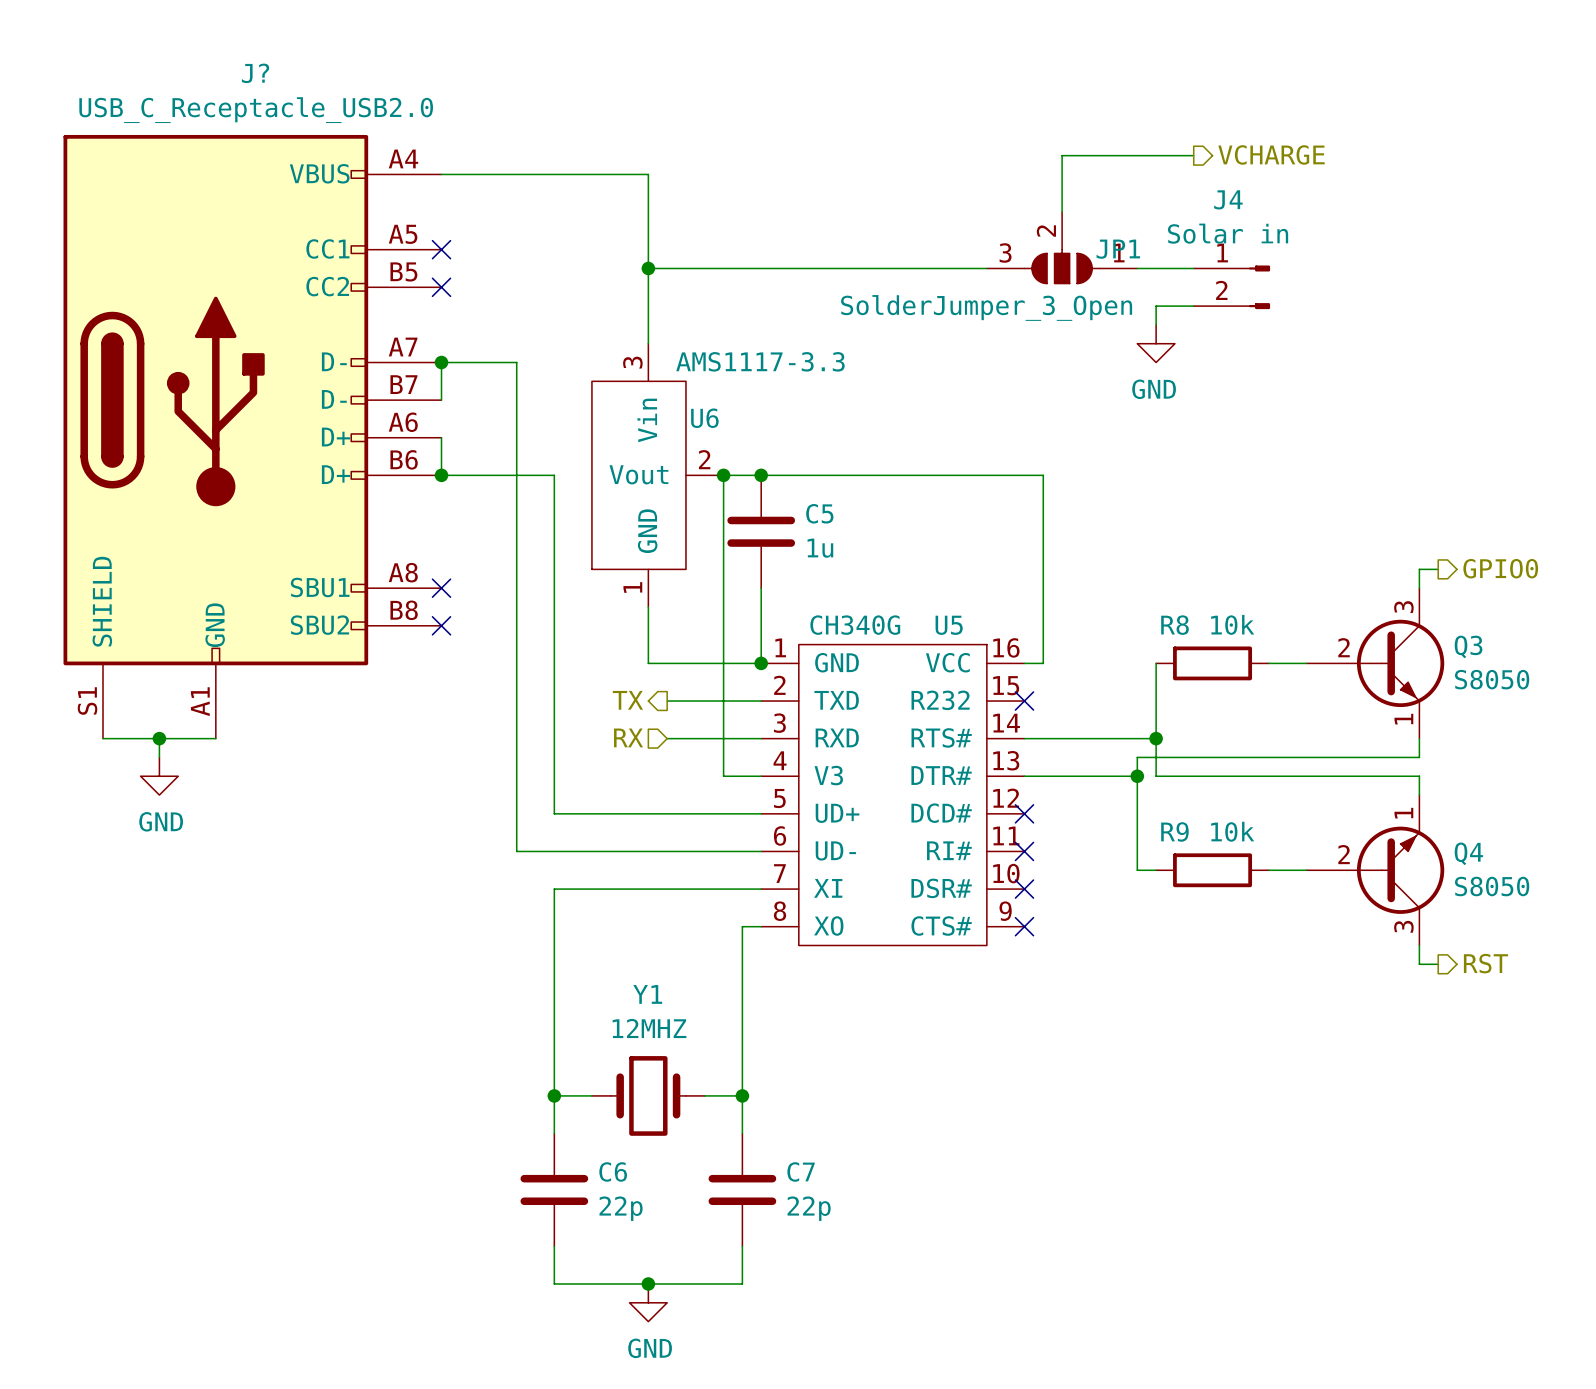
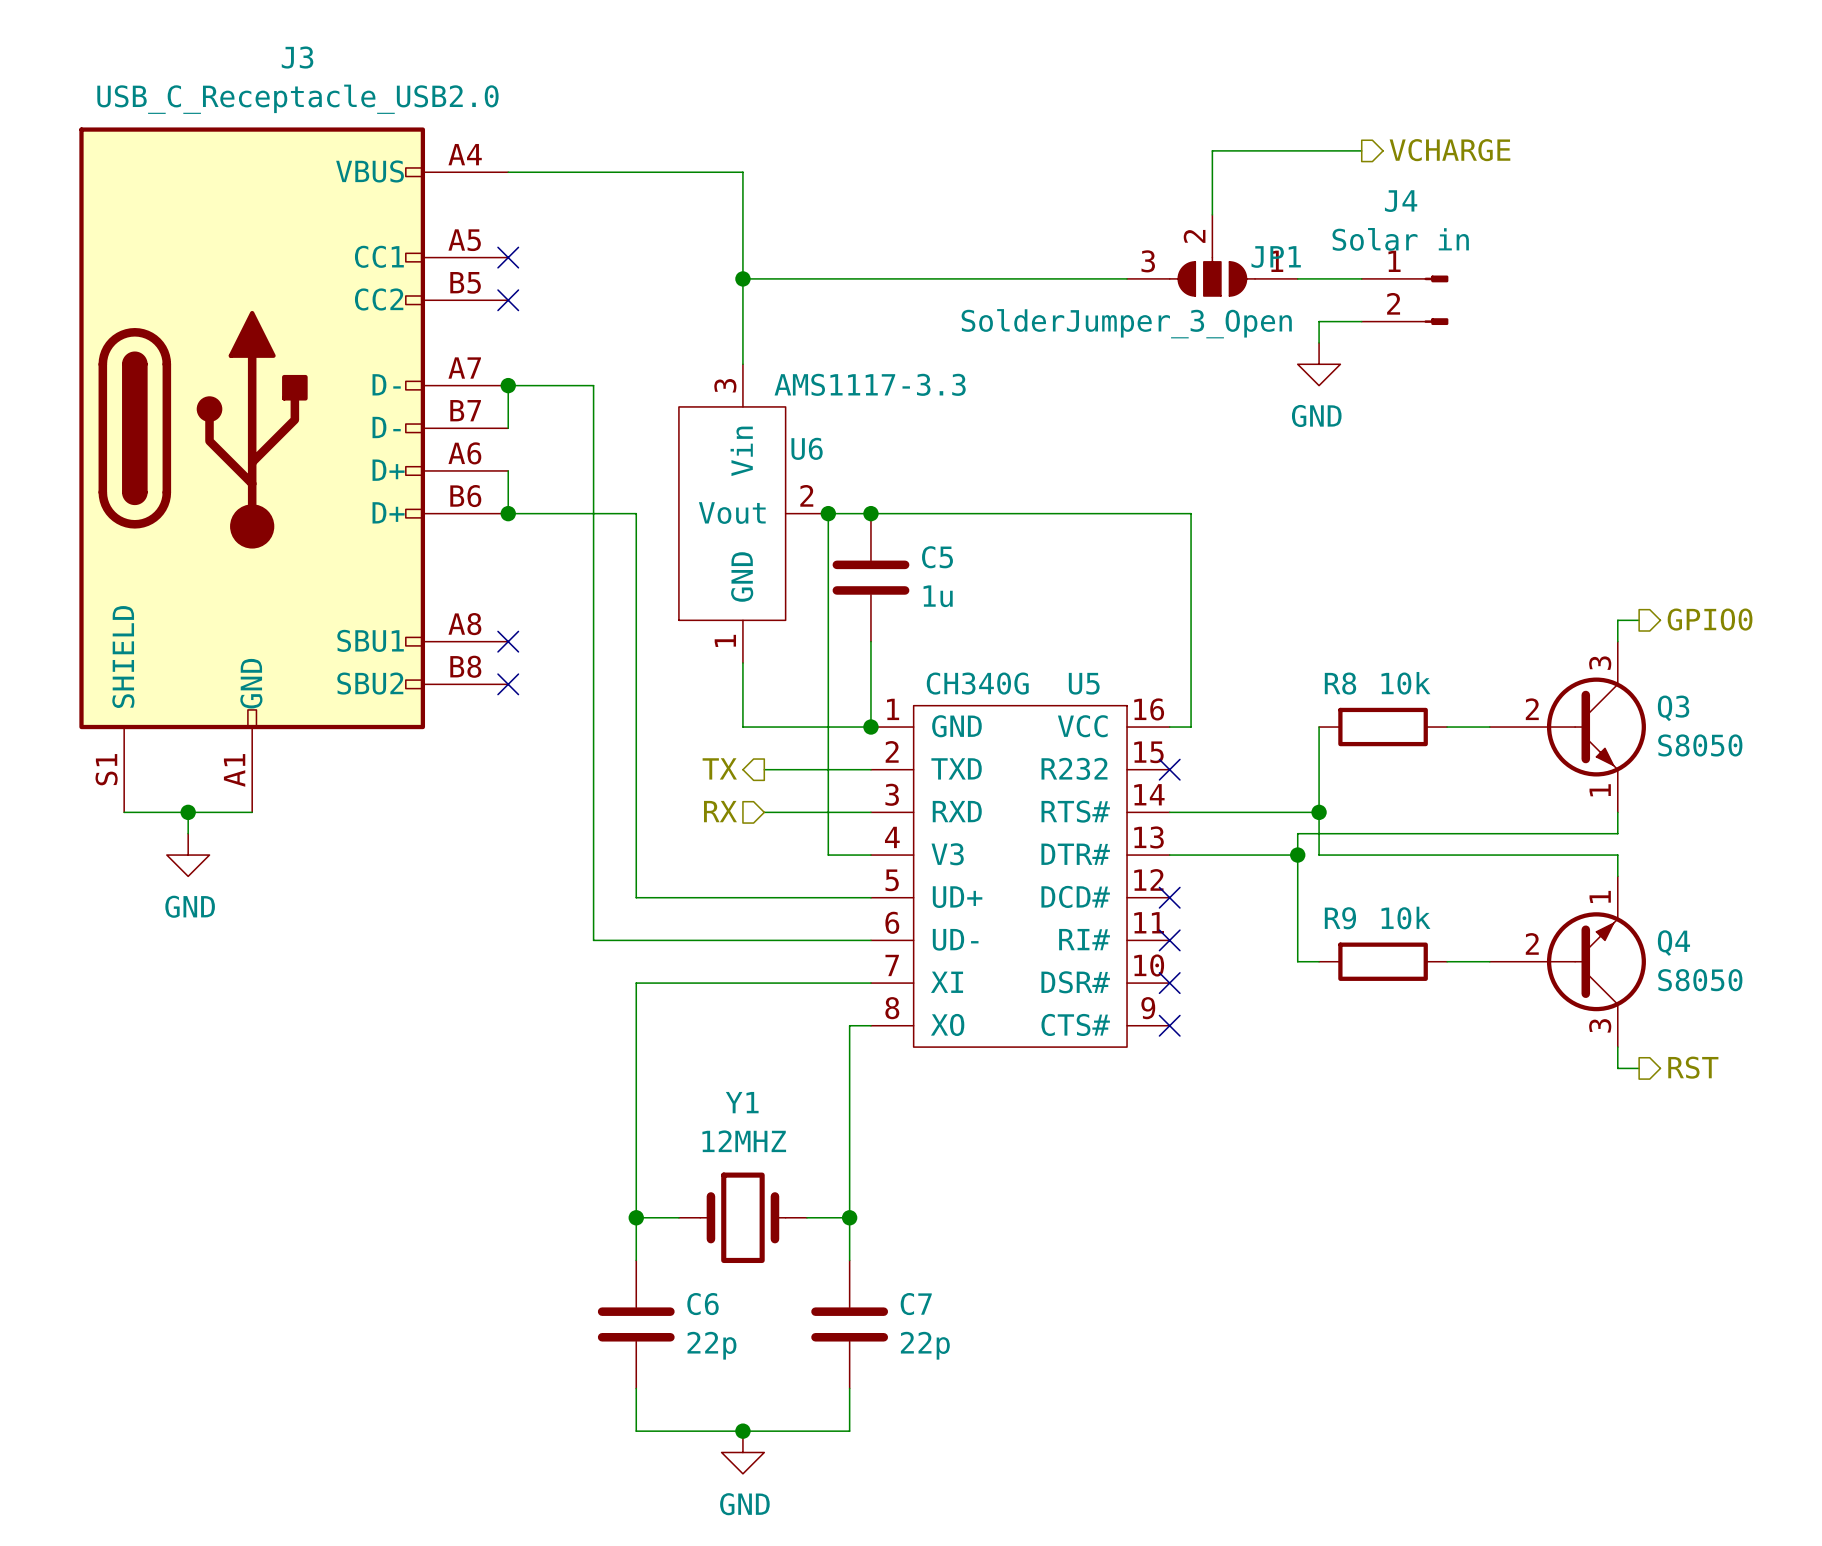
J? name: J? (255, 73) -> J3 (297, 57)

